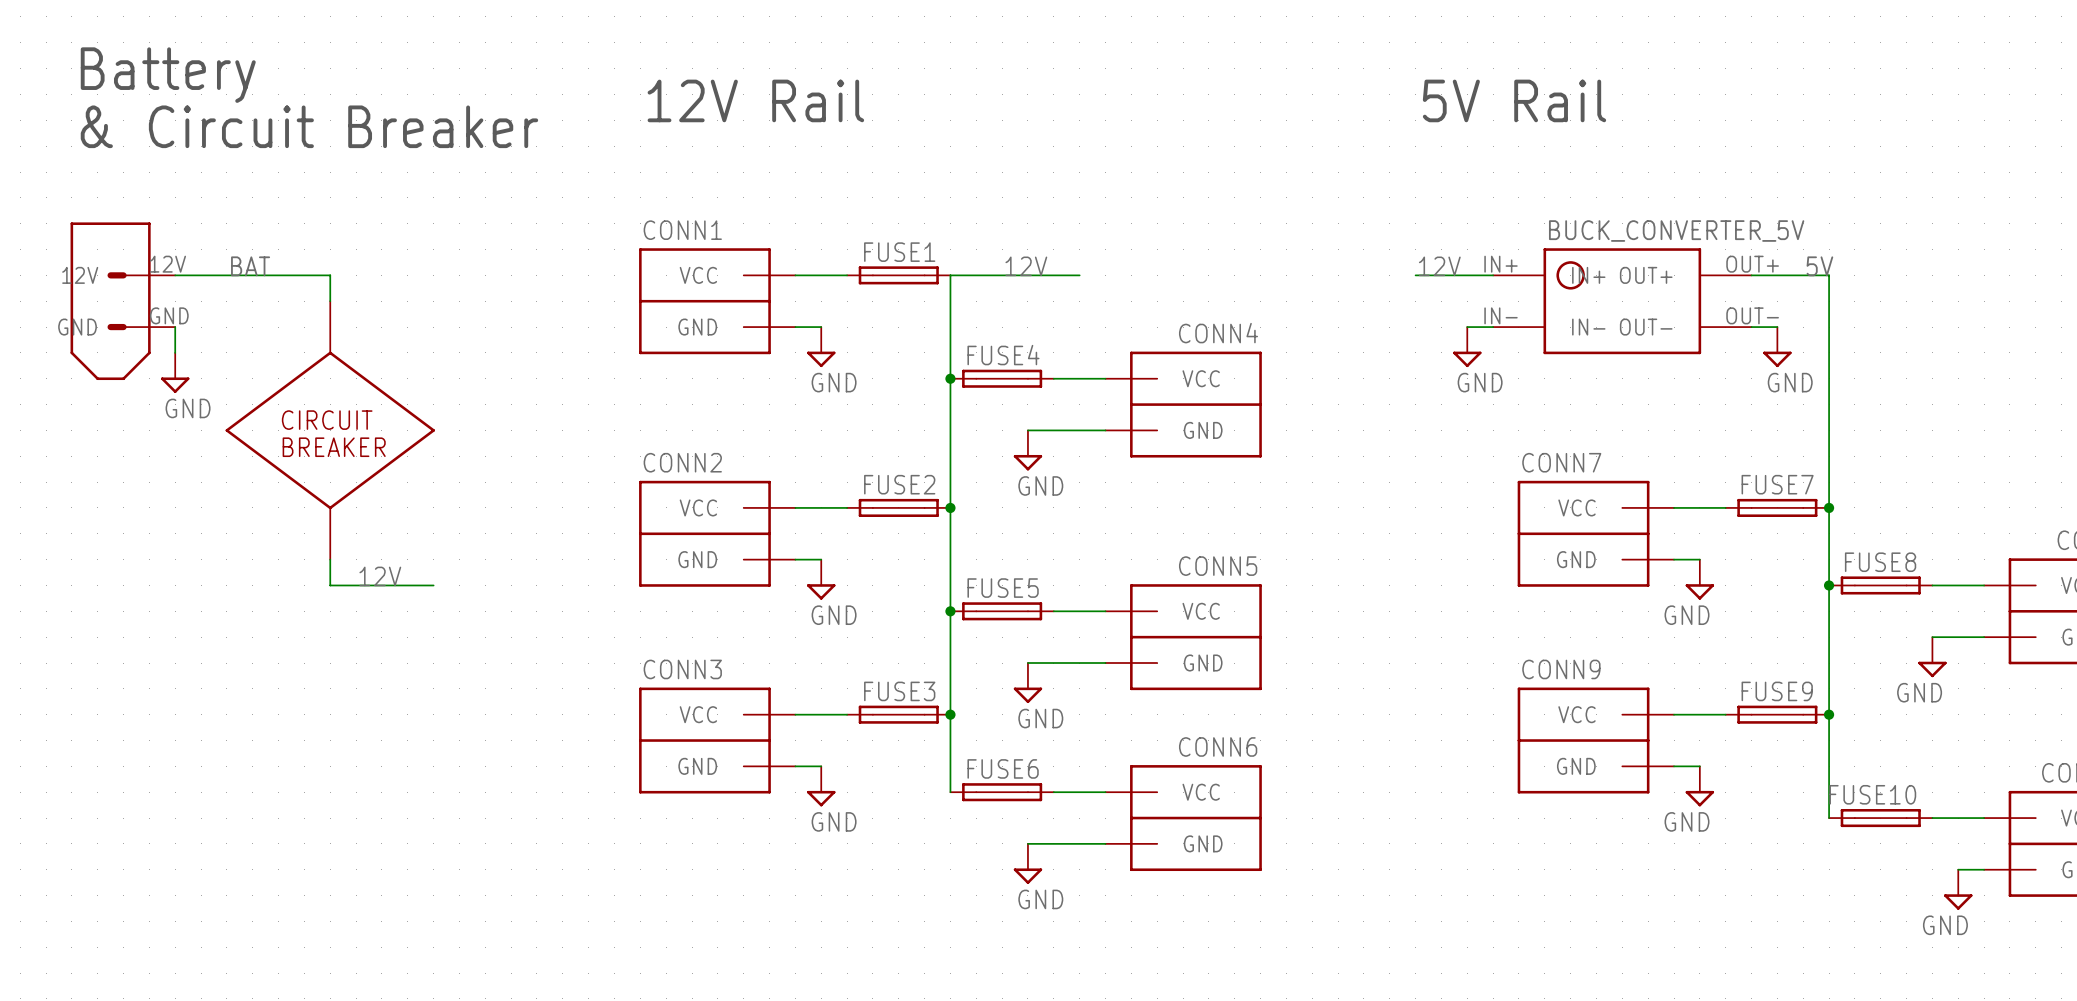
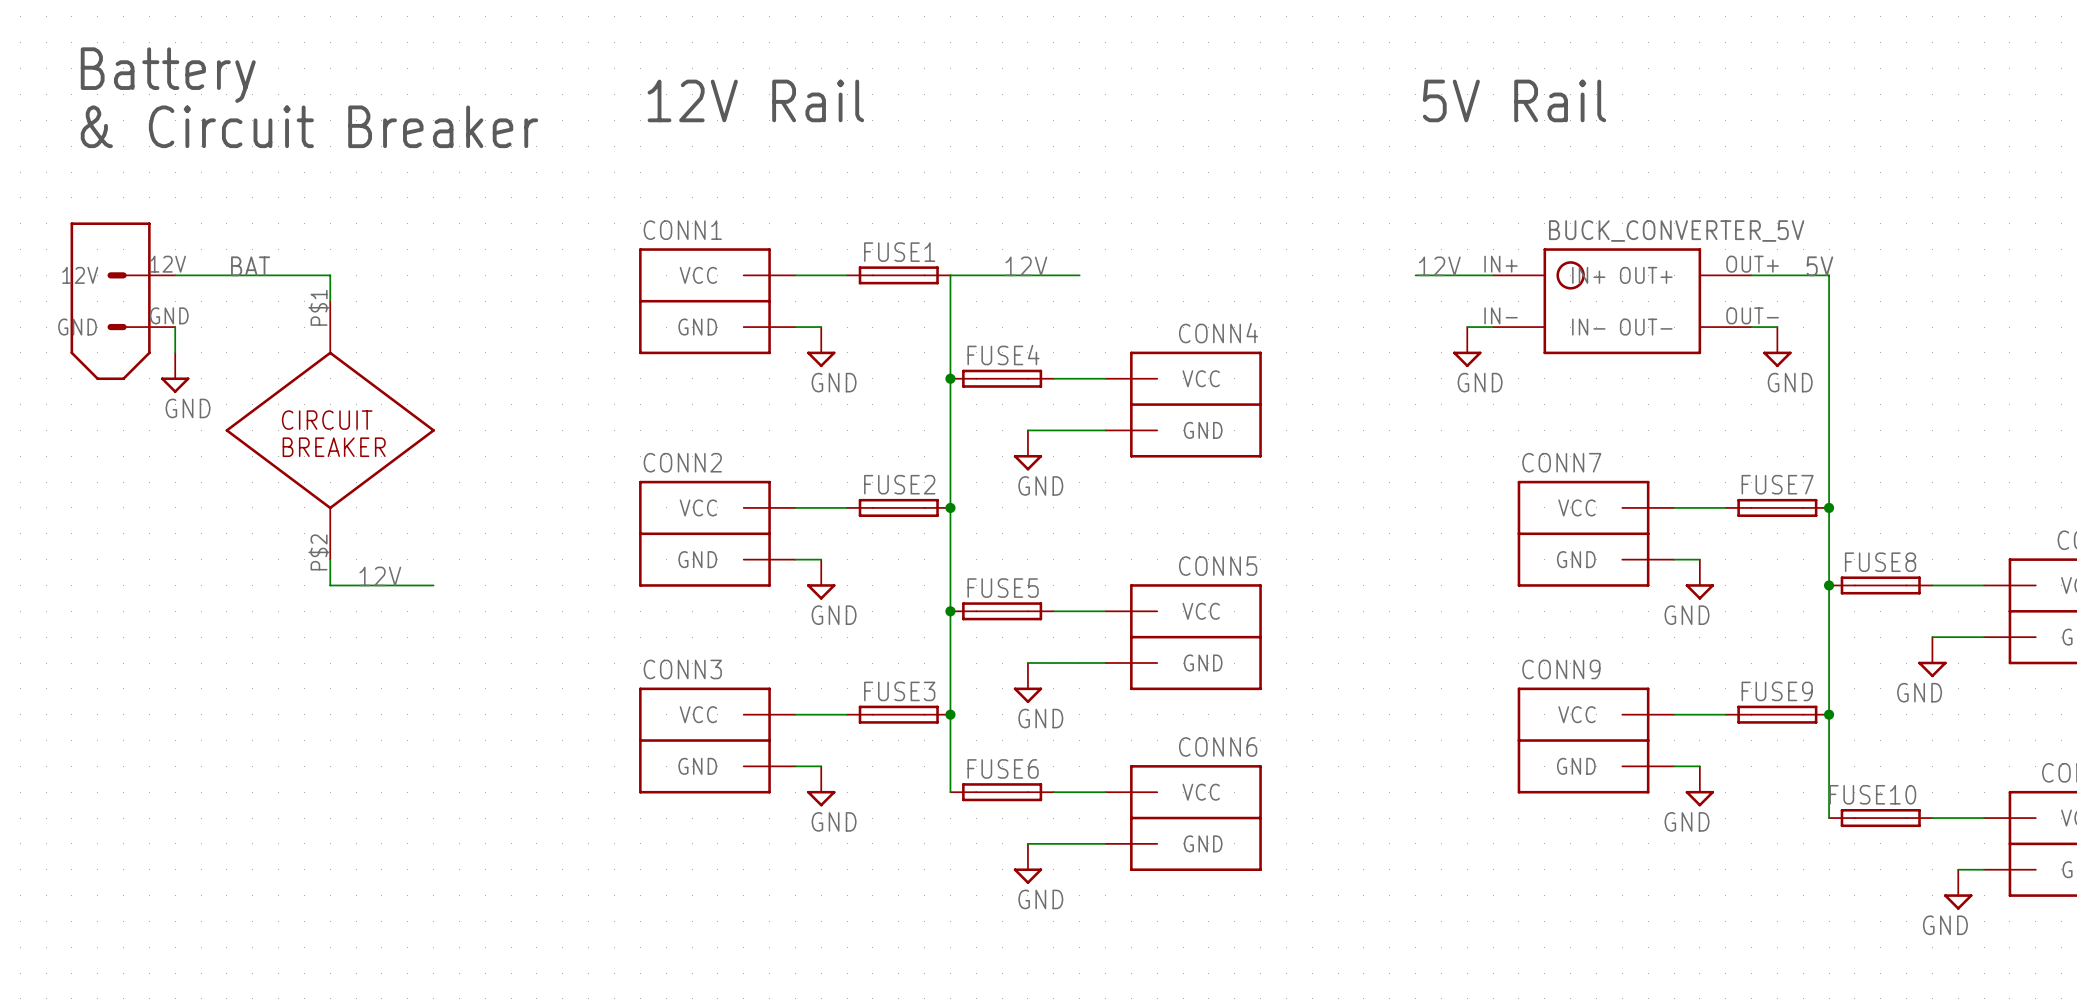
part pin number: none -> P$1 (319, 307)
part pin number: none -> P$2 (319, 552)

